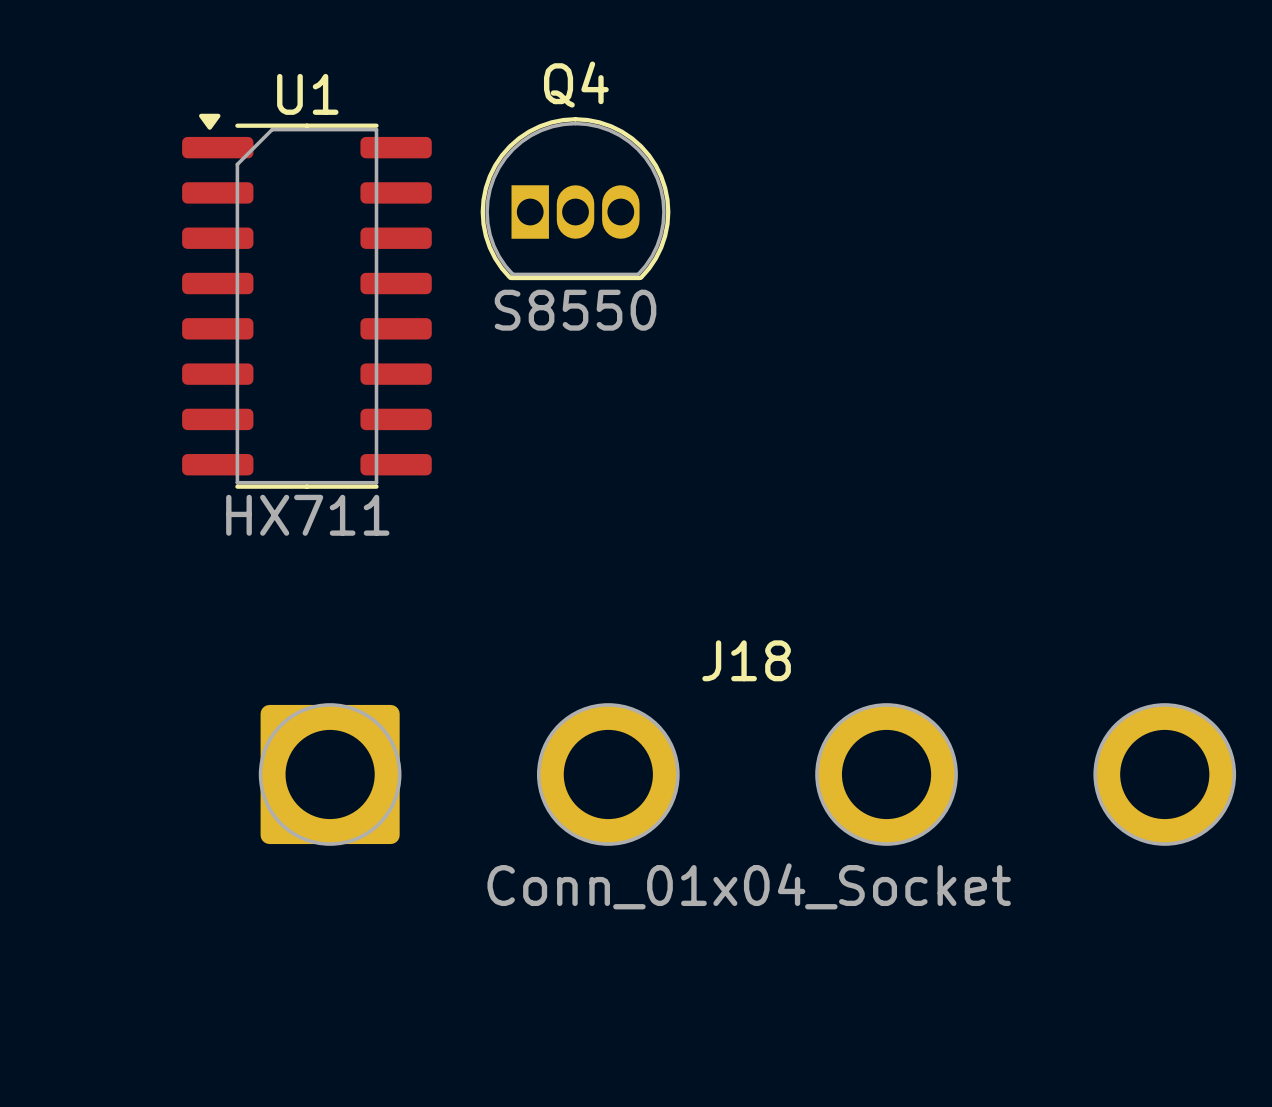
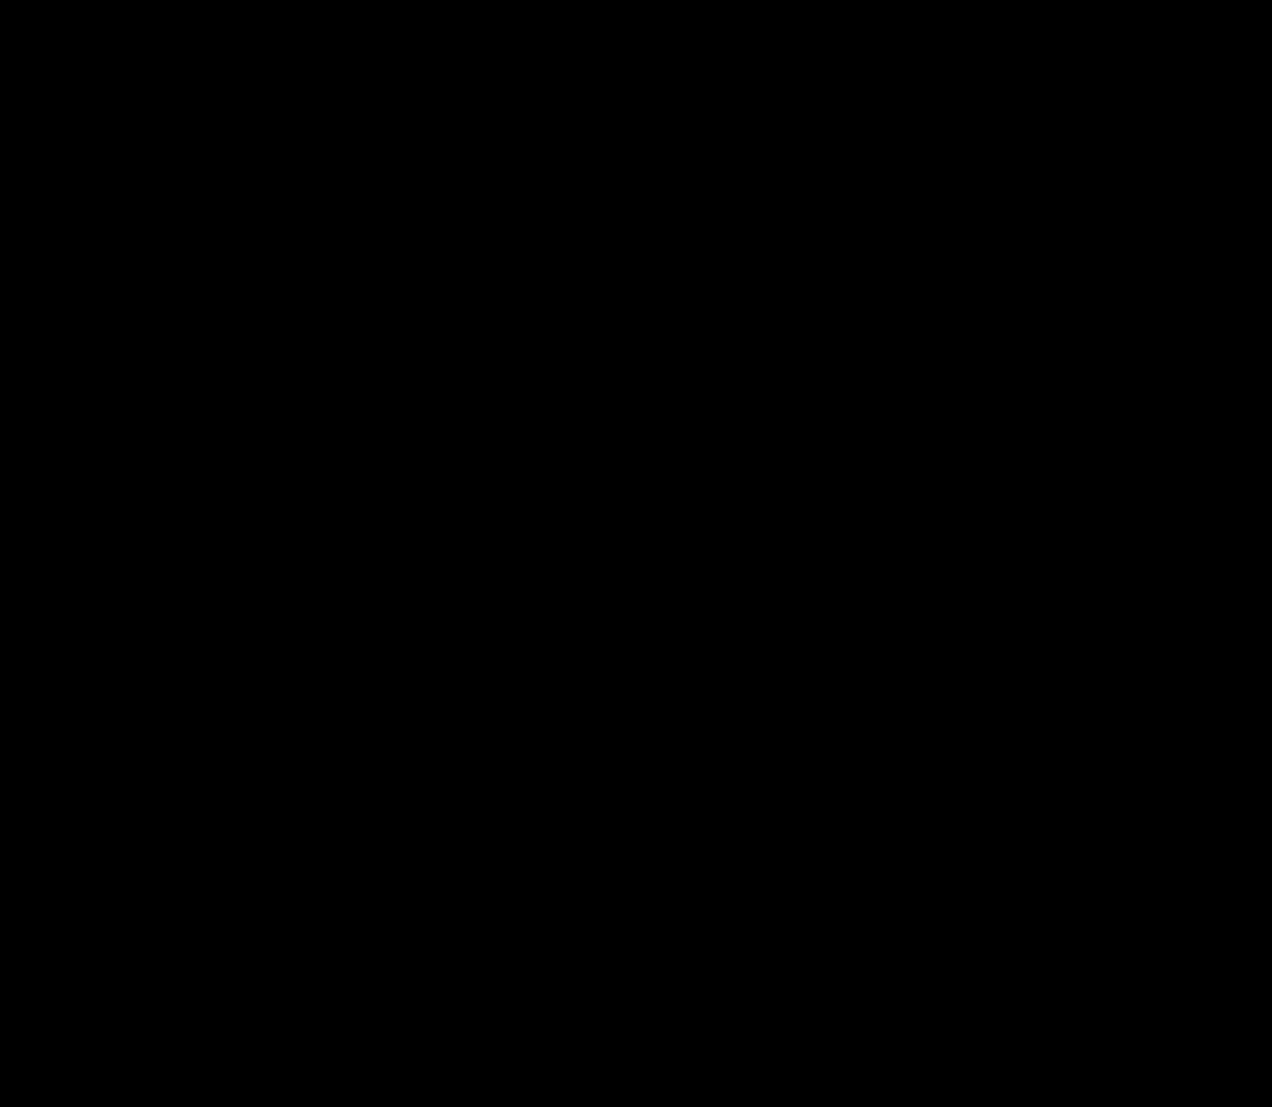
Q4: S8550 (575, 198) -> none
U1: HX711 (306, 301) -> none
J18: Conn_01x04_Socket (747, 774) -> none

